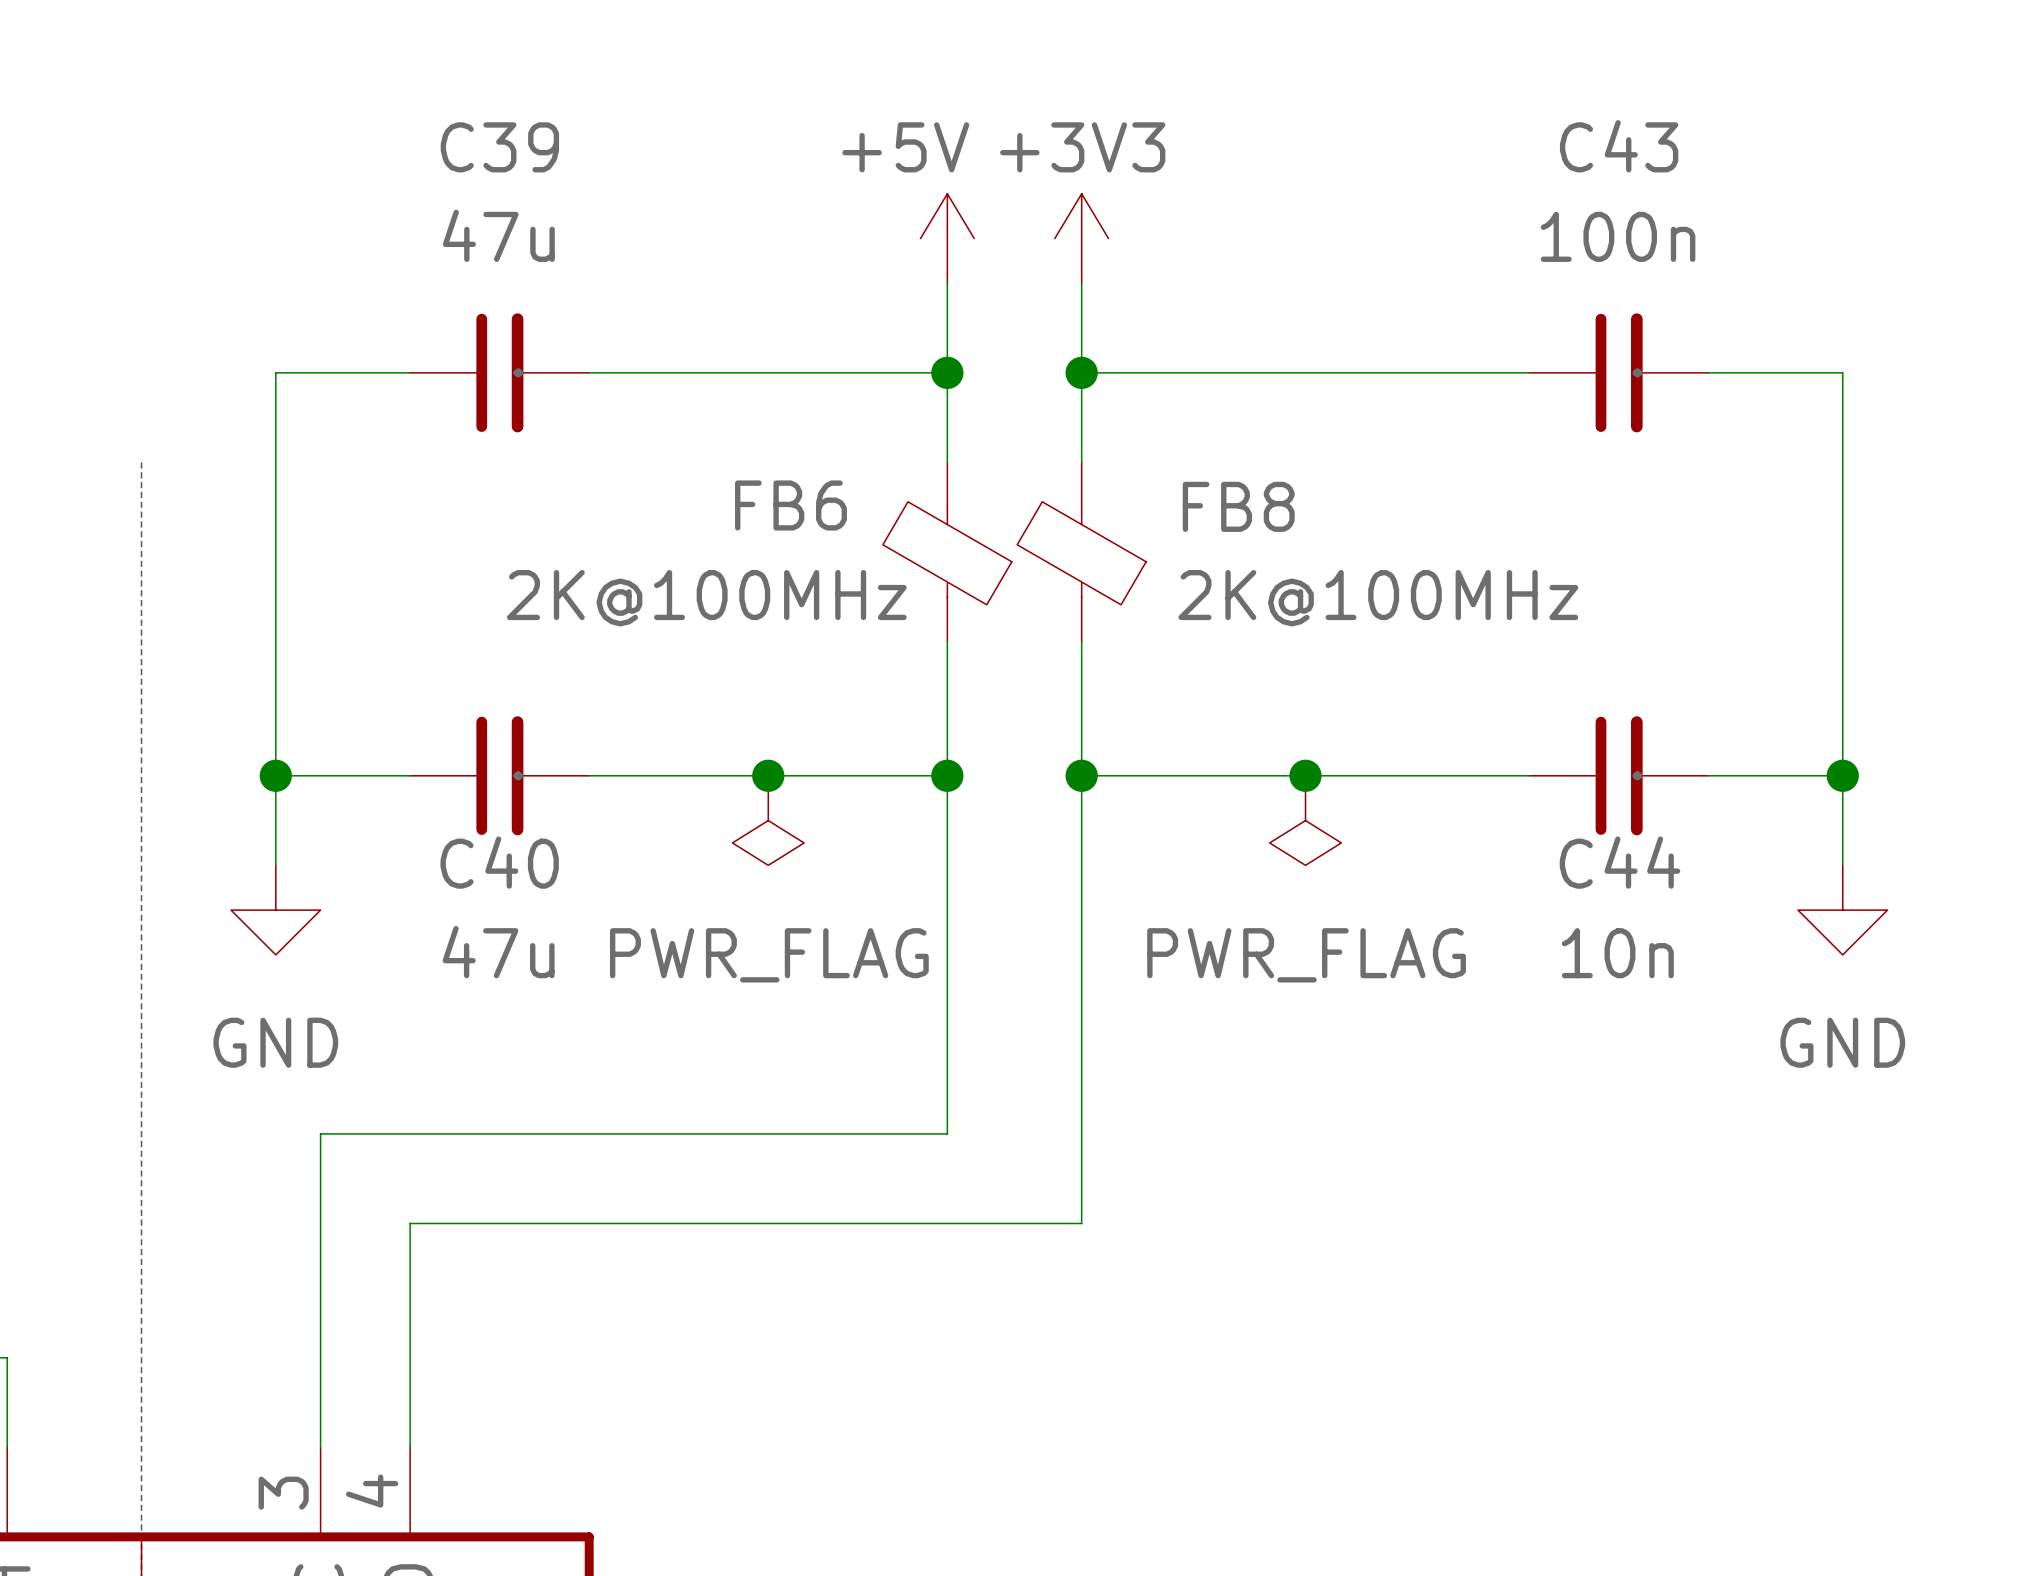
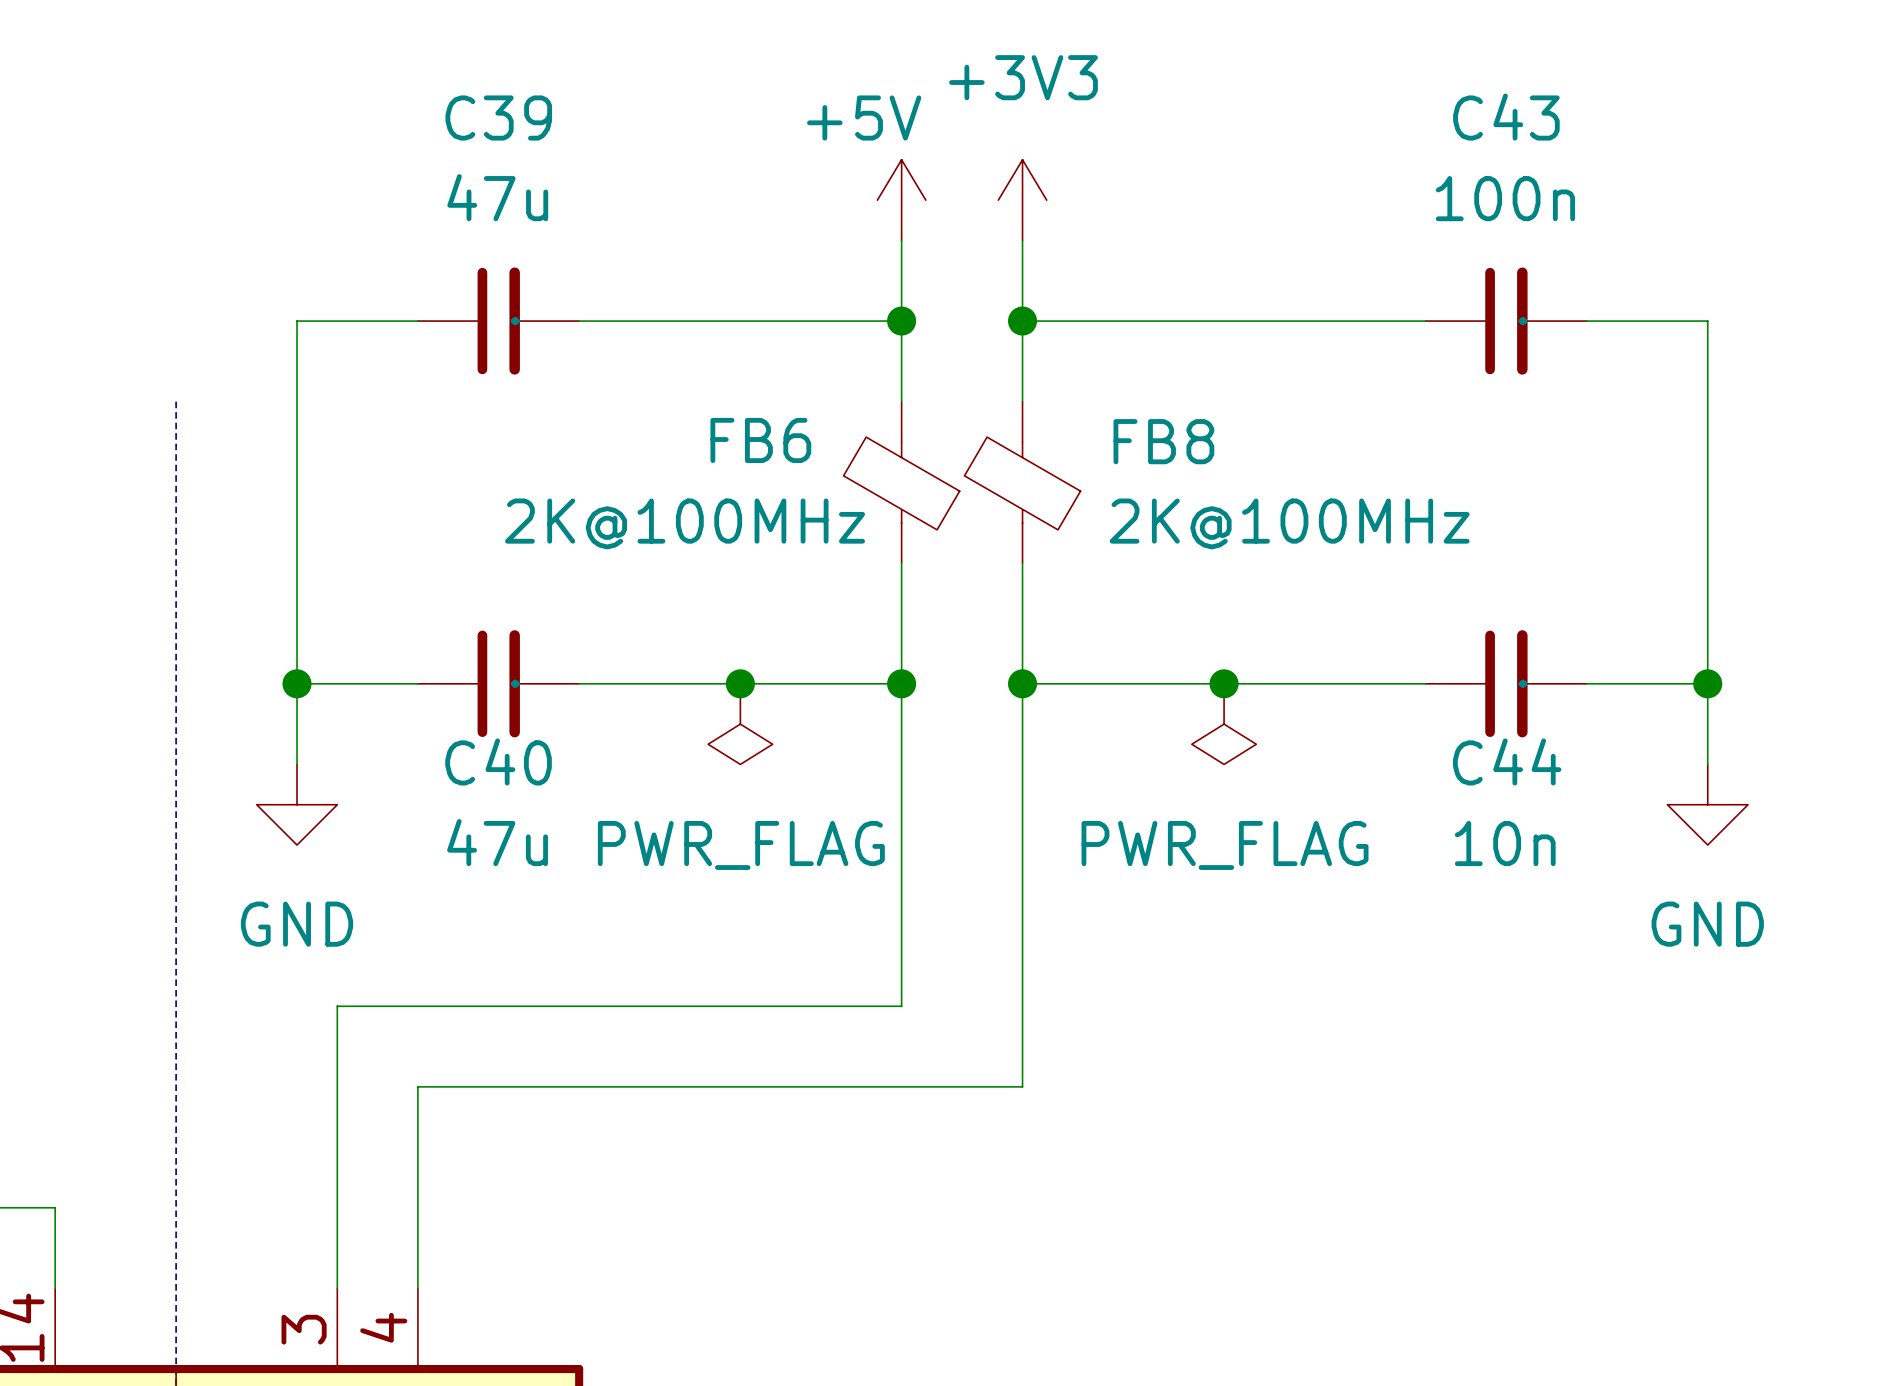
power symbol text position: +3V3 (1082, 147) -> +3V3 (1023, 77)

